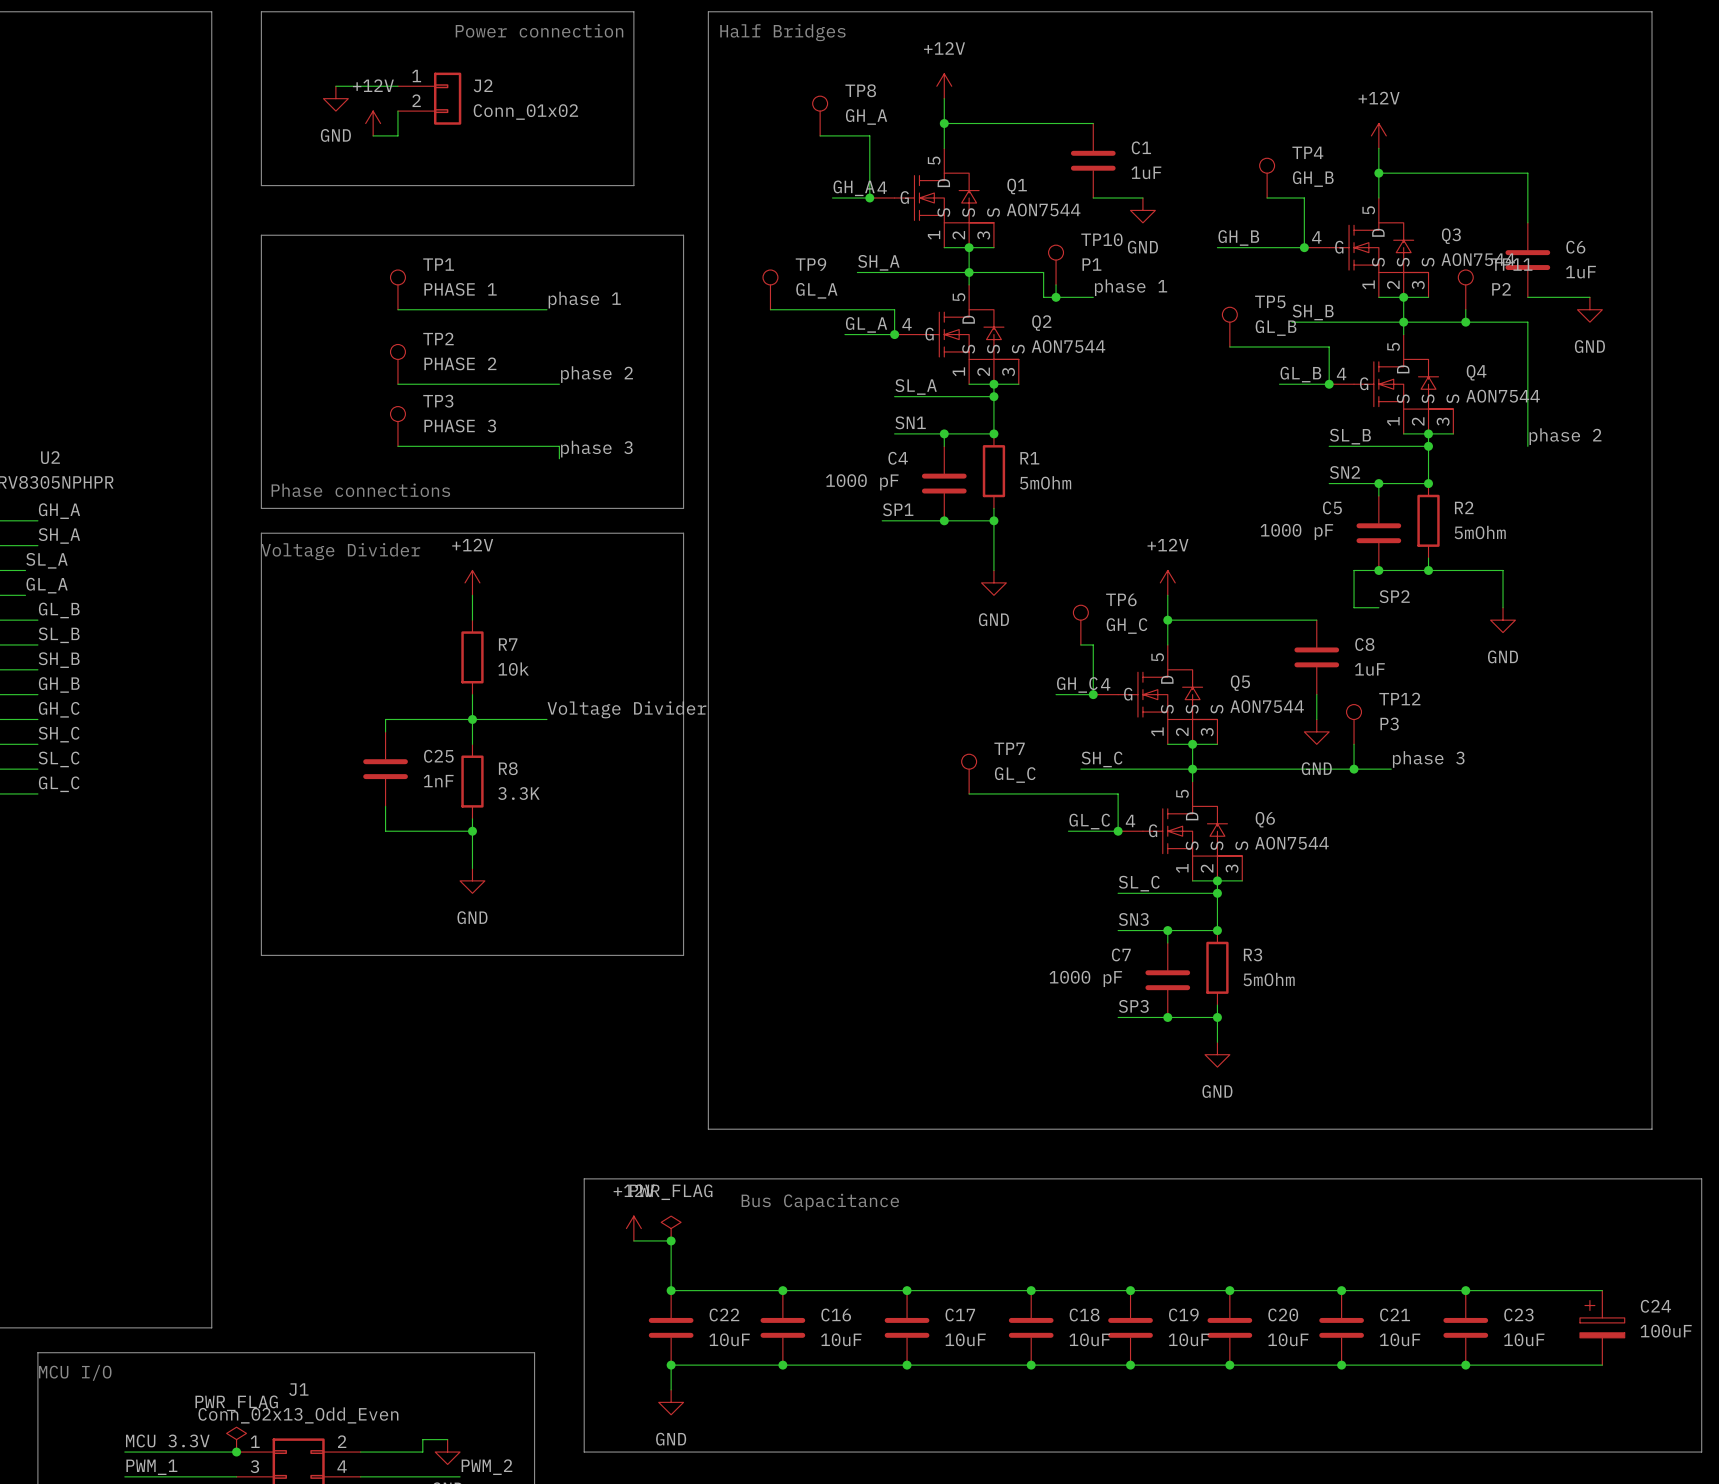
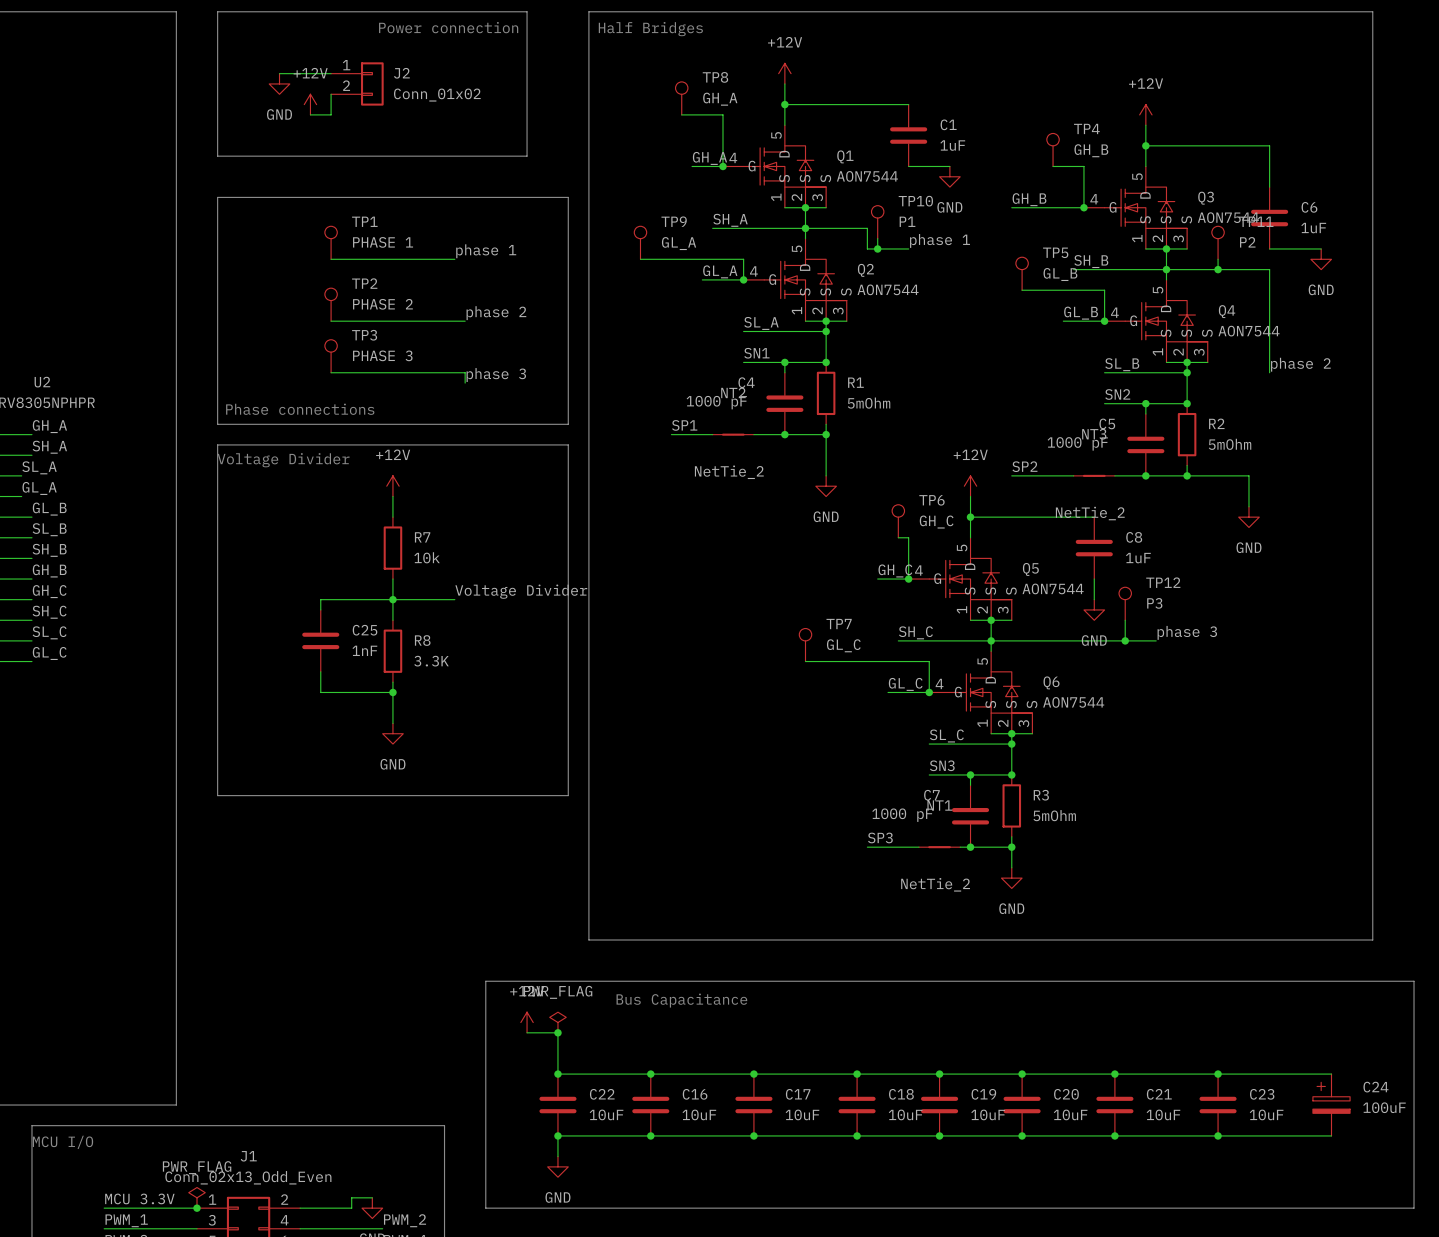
label position: SP1 (898, 509) -> SP1 (684, 425)
wire: none -> (671, 434) (712, 434)
NT2: none -> NetTie_2 (733, 434)
wire: none -> (1011, 475) (1073, 475)
NT3: none -> NetTie_2 (1094, 475)
wire: (1354, 570) (1354, 607) (1378, 607) -> (1125, 475) (1114, 475)
label position: SP2 (1394, 596) -> SP2 (1024, 466)
label position: SP3 (1133, 1006) -> SP3 (880, 837)
wire: none -> (867, 847) (918, 847)
NT1: none -> NetTie_2 (939, 847)

